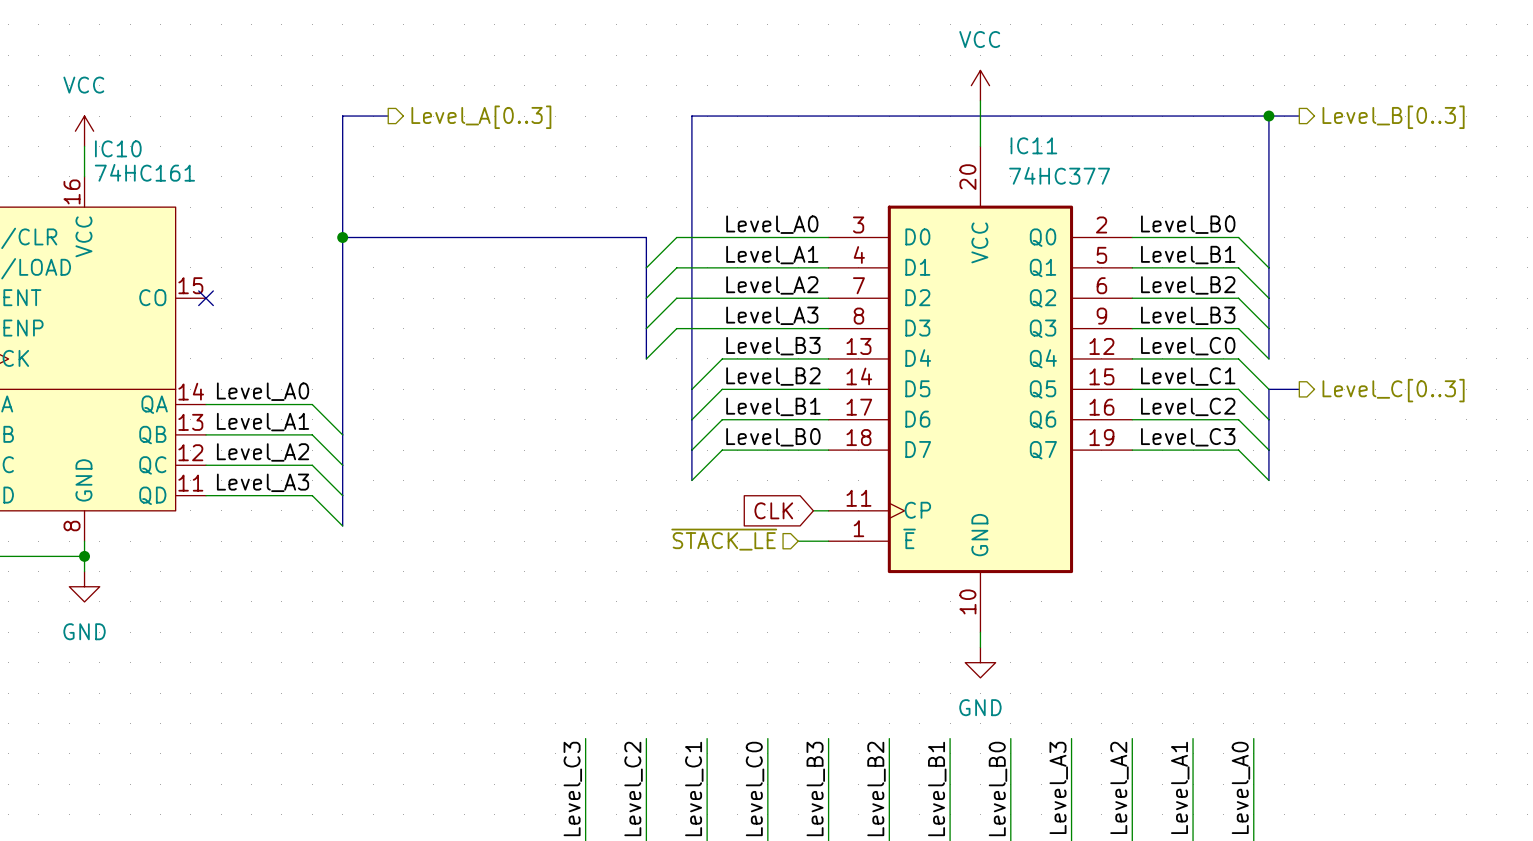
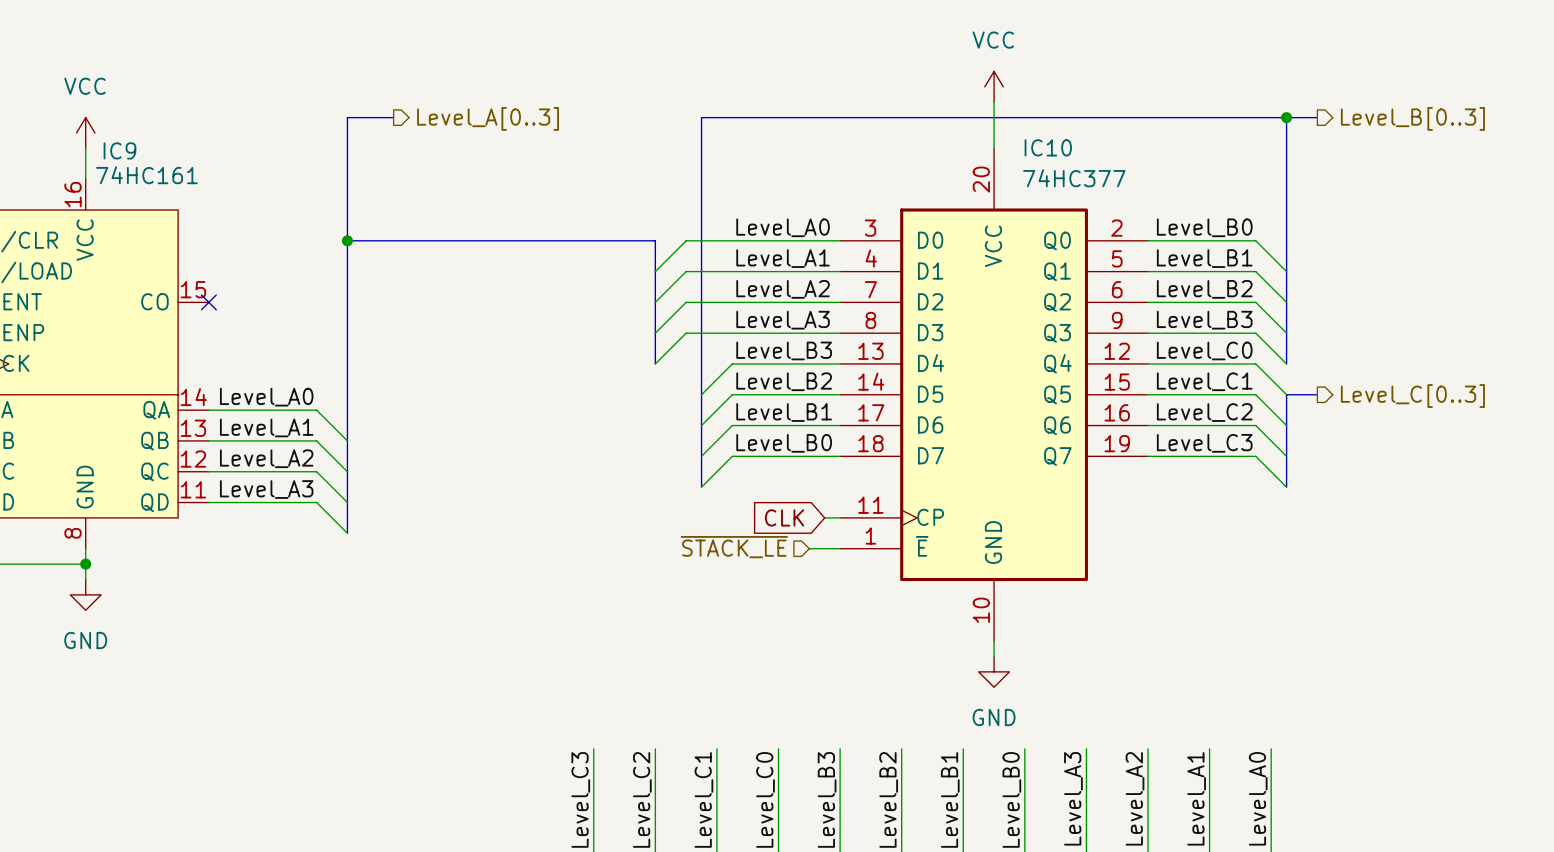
IC11 name: IC11 (1033, 145) -> IC10 (1048, 147)
IC10 name: IC10 (118, 148) -> IC9 (119, 150)

